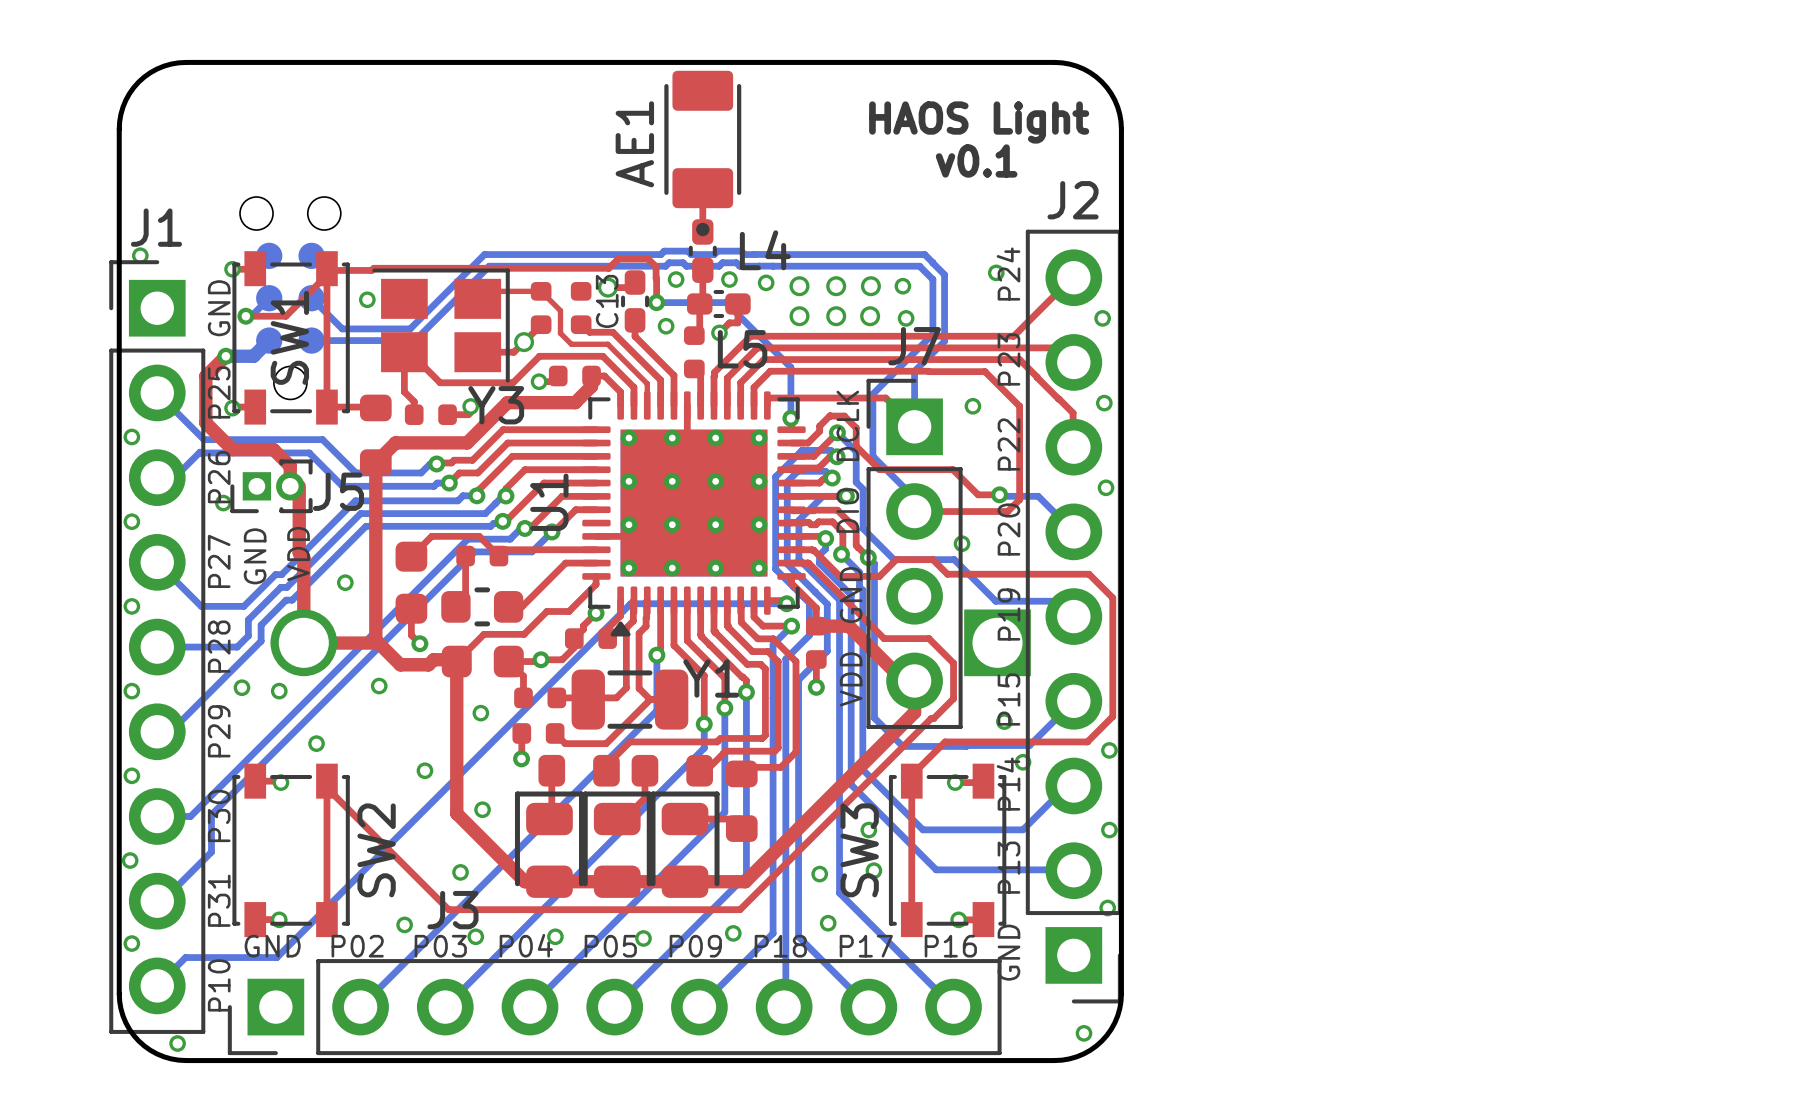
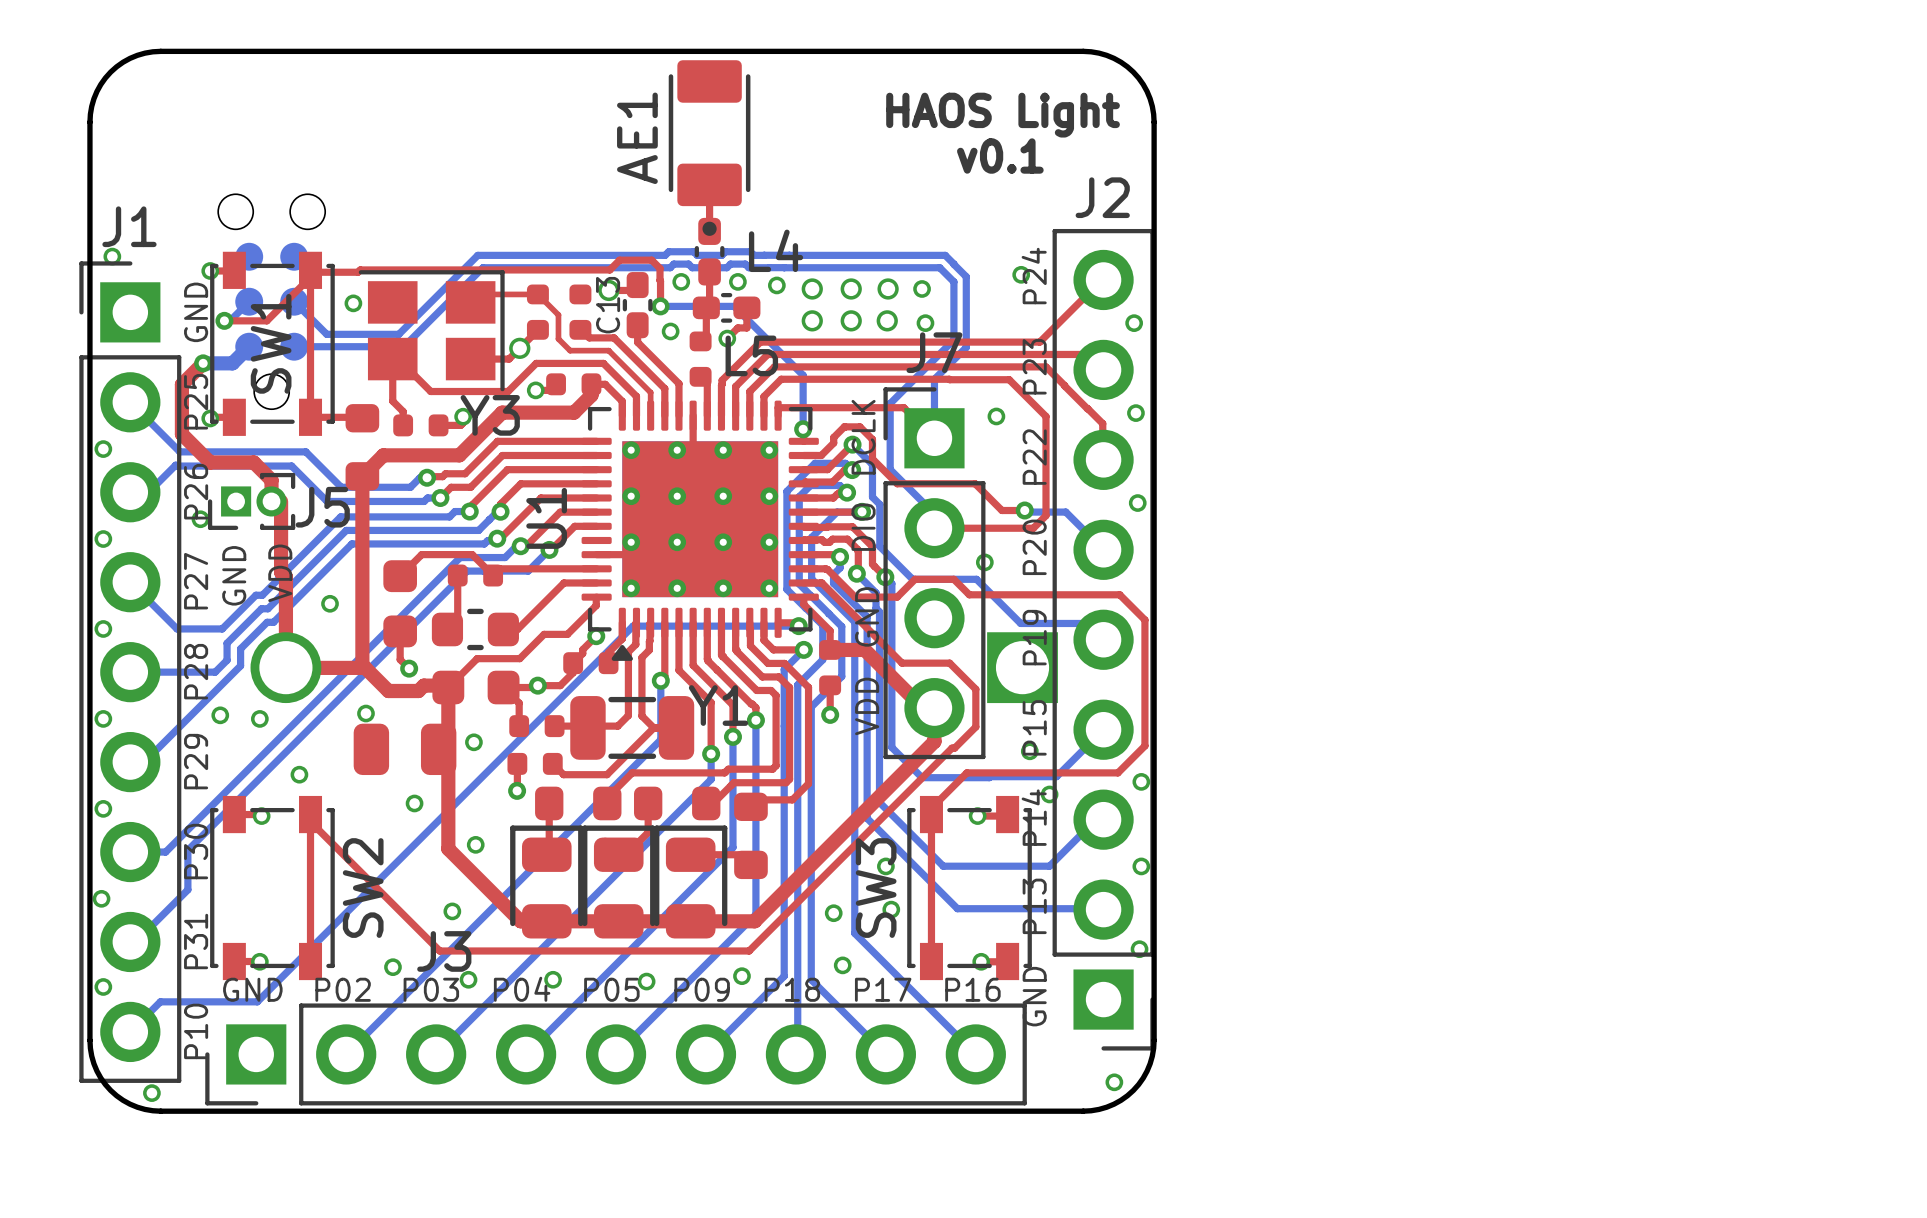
part: none -> (405, 749)

